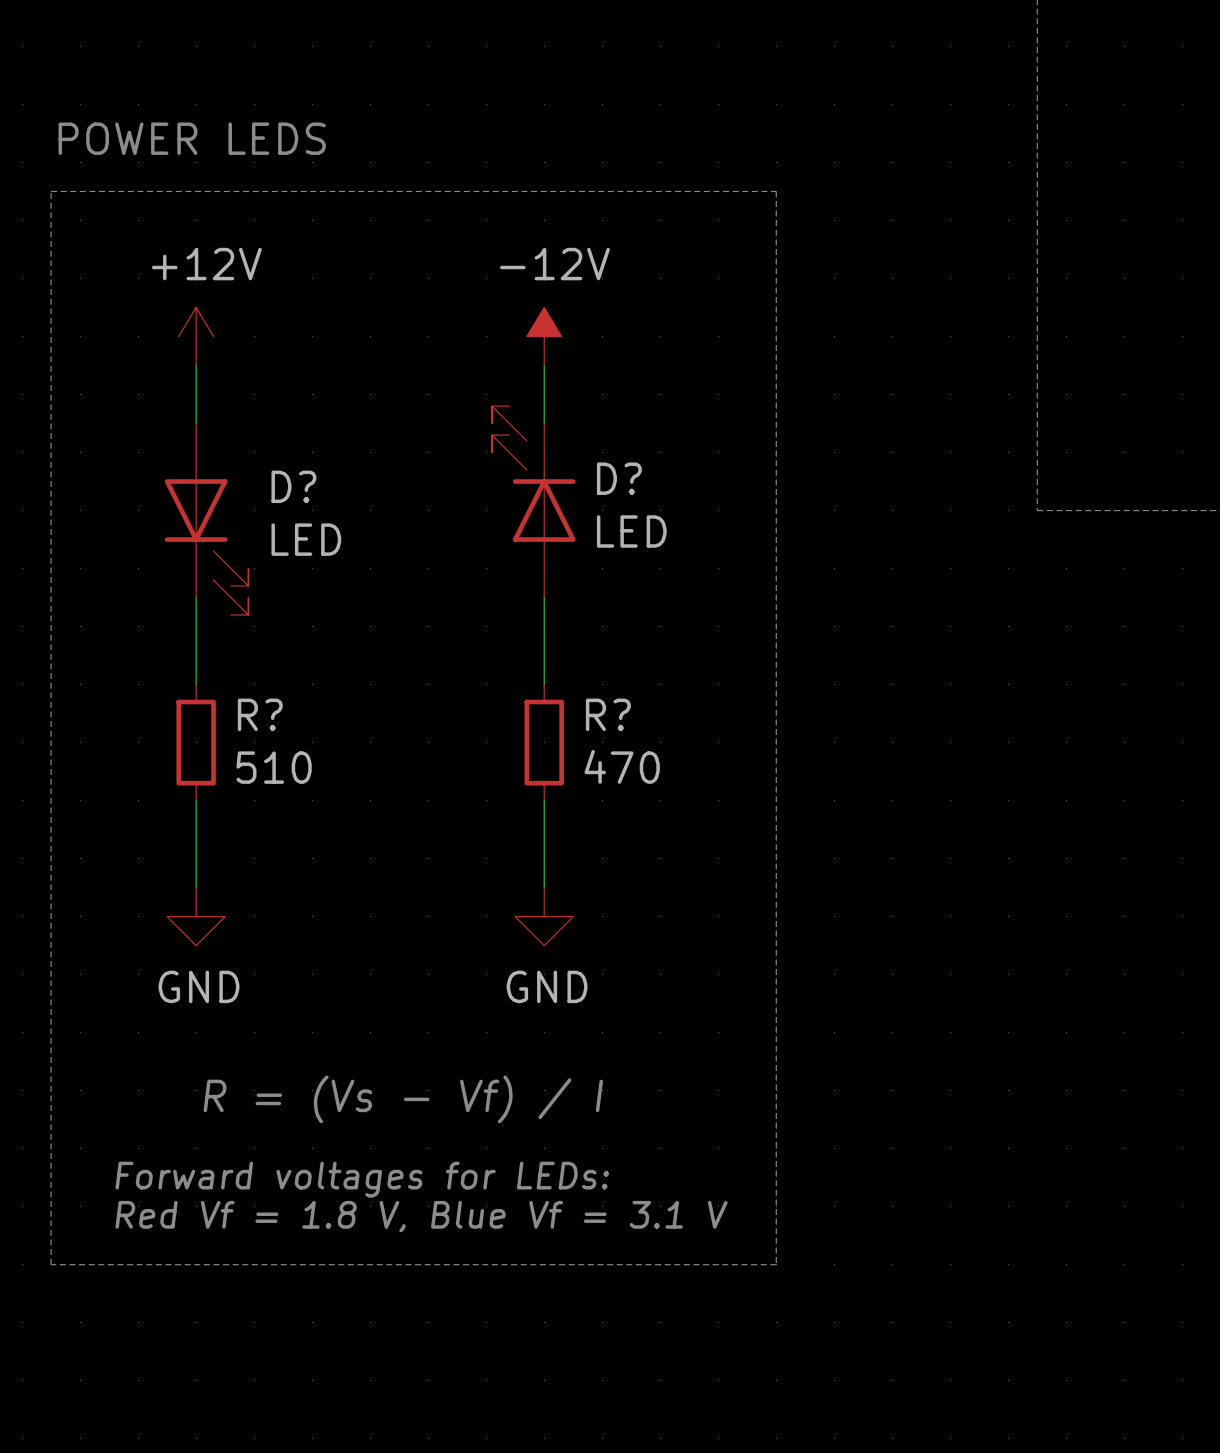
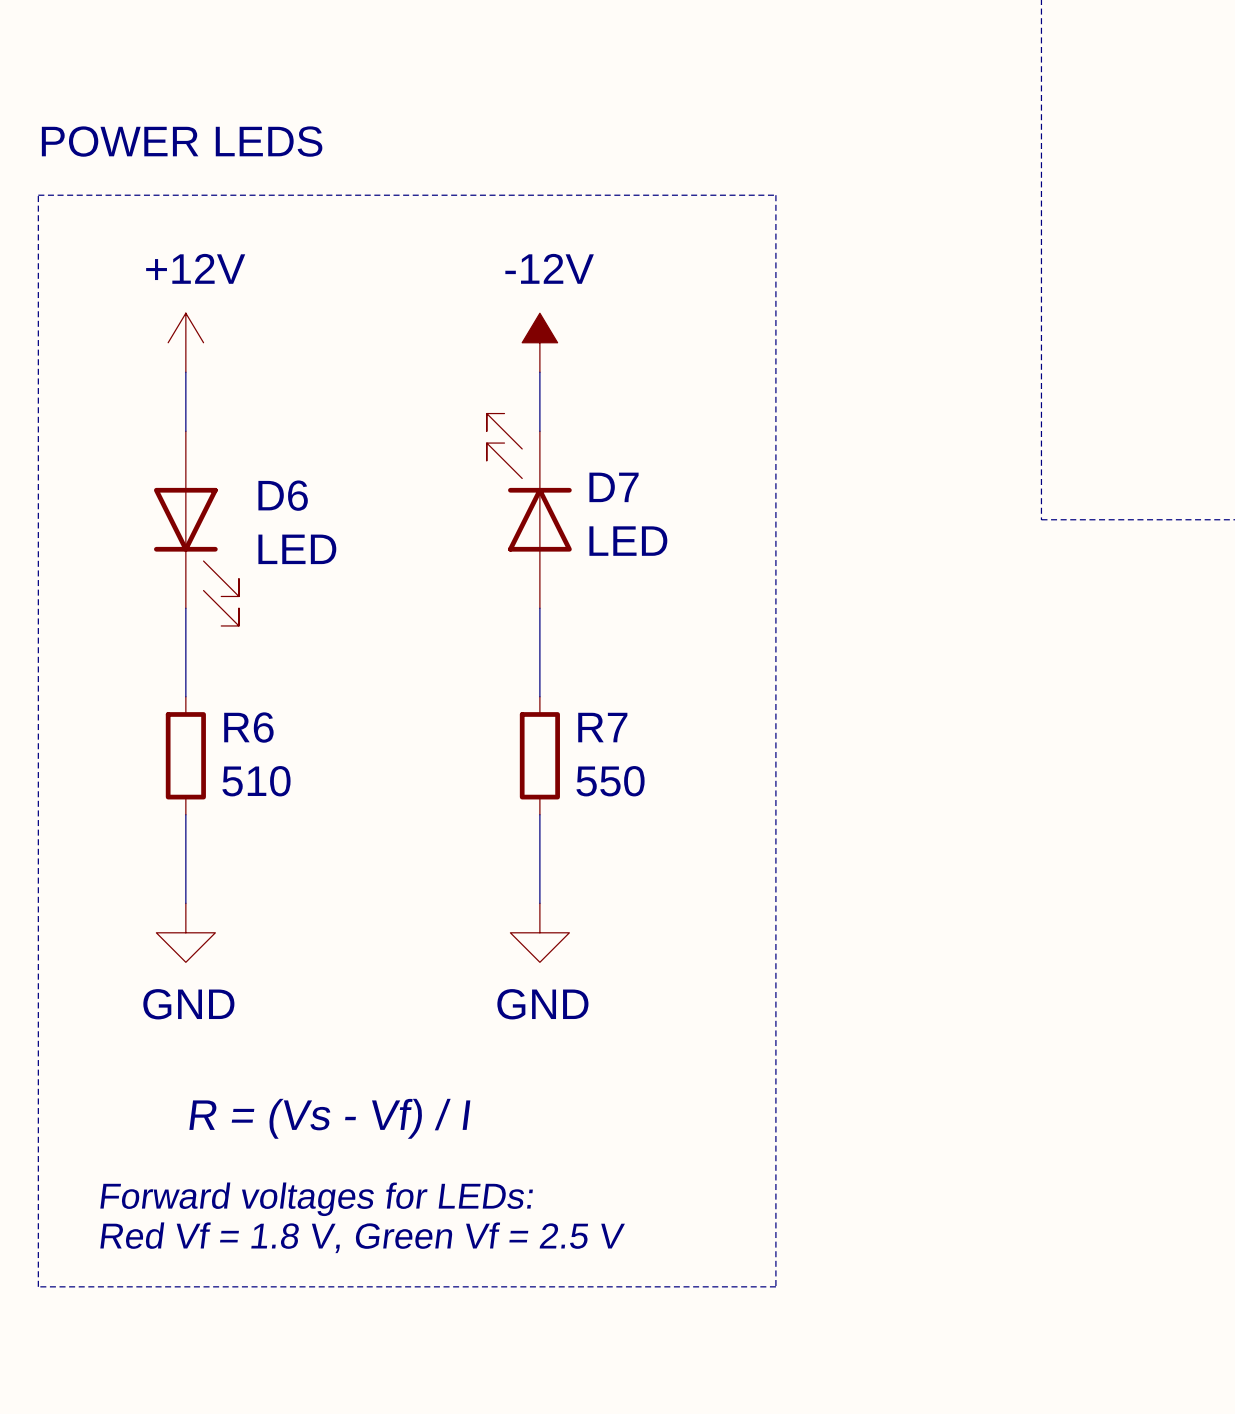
D? name: D? (619, 478) -> D7 (614, 487)
D? name: D? (293, 486) -> D6 (283, 495)
R? name: R? (260, 714) -> R6 (248, 727)
R? name: R? (608, 714) -> R7 (602, 727)
R? value: 470 (622, 766) -> 550 (610, 781)
text: Red Vf = 1.8 V, Blue Vf = 3.1 V (421, 1216) -> Red Vf = 1.8 V, Green Vf = 2.5 V (362, 1237)

